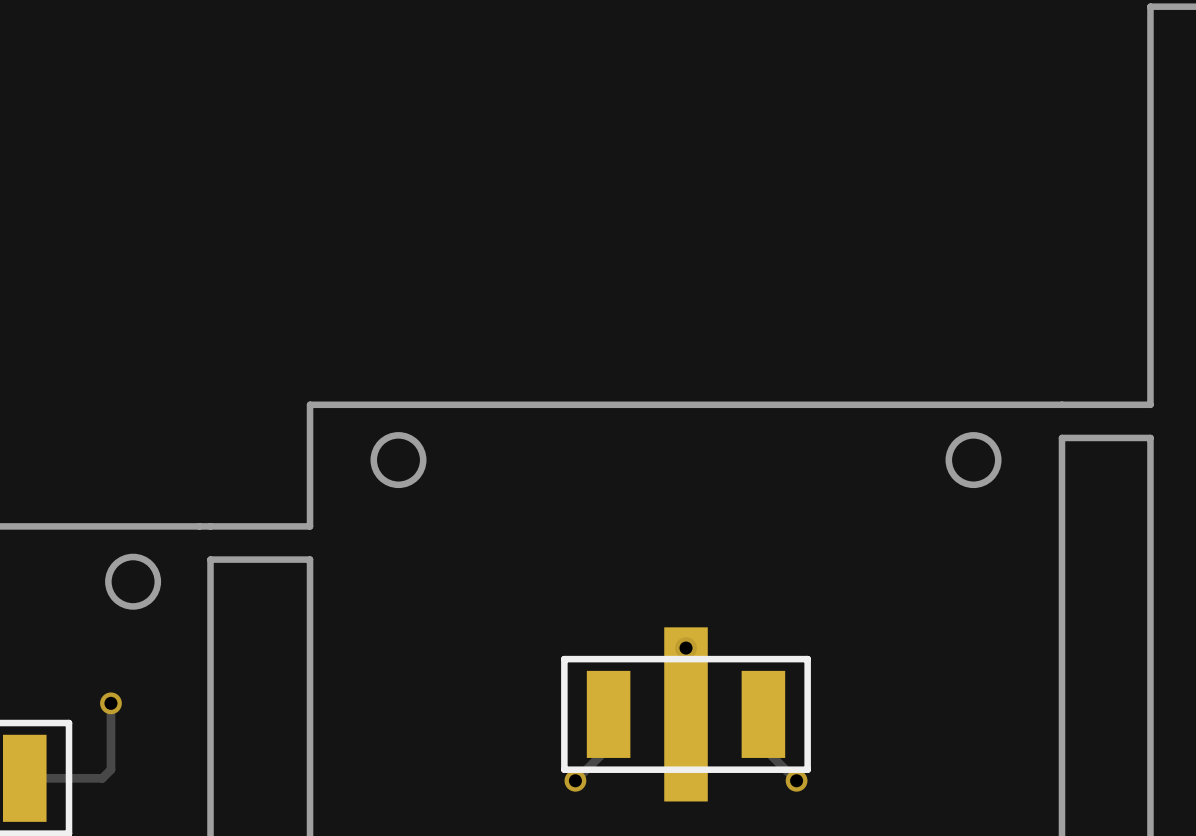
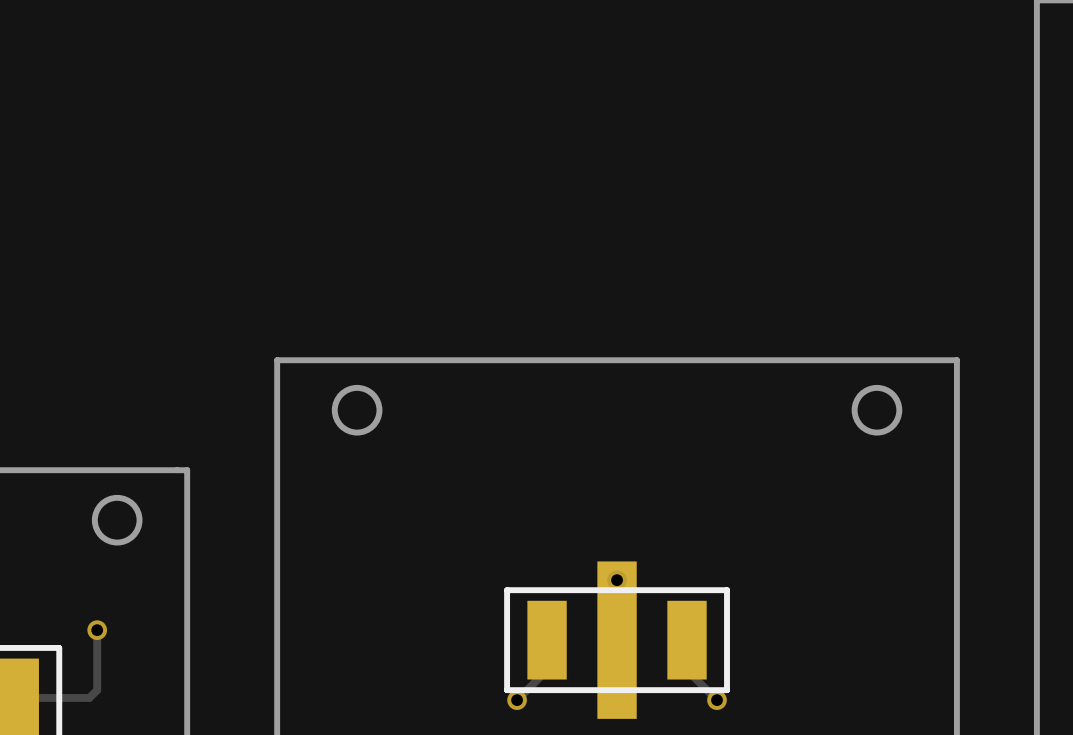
board edge: (1150, 404) (1061, 404) -> (1036, 360) (1036, 390)
board edge: (1150, 437) (1061, 437) -> (956, 360) (956, 390)
board edge: (310, 526) (210, 526) -> (277, 470) (277, 500)
board edge: (310, 559) (210, 559) -> (187, 470) (187, 500)

